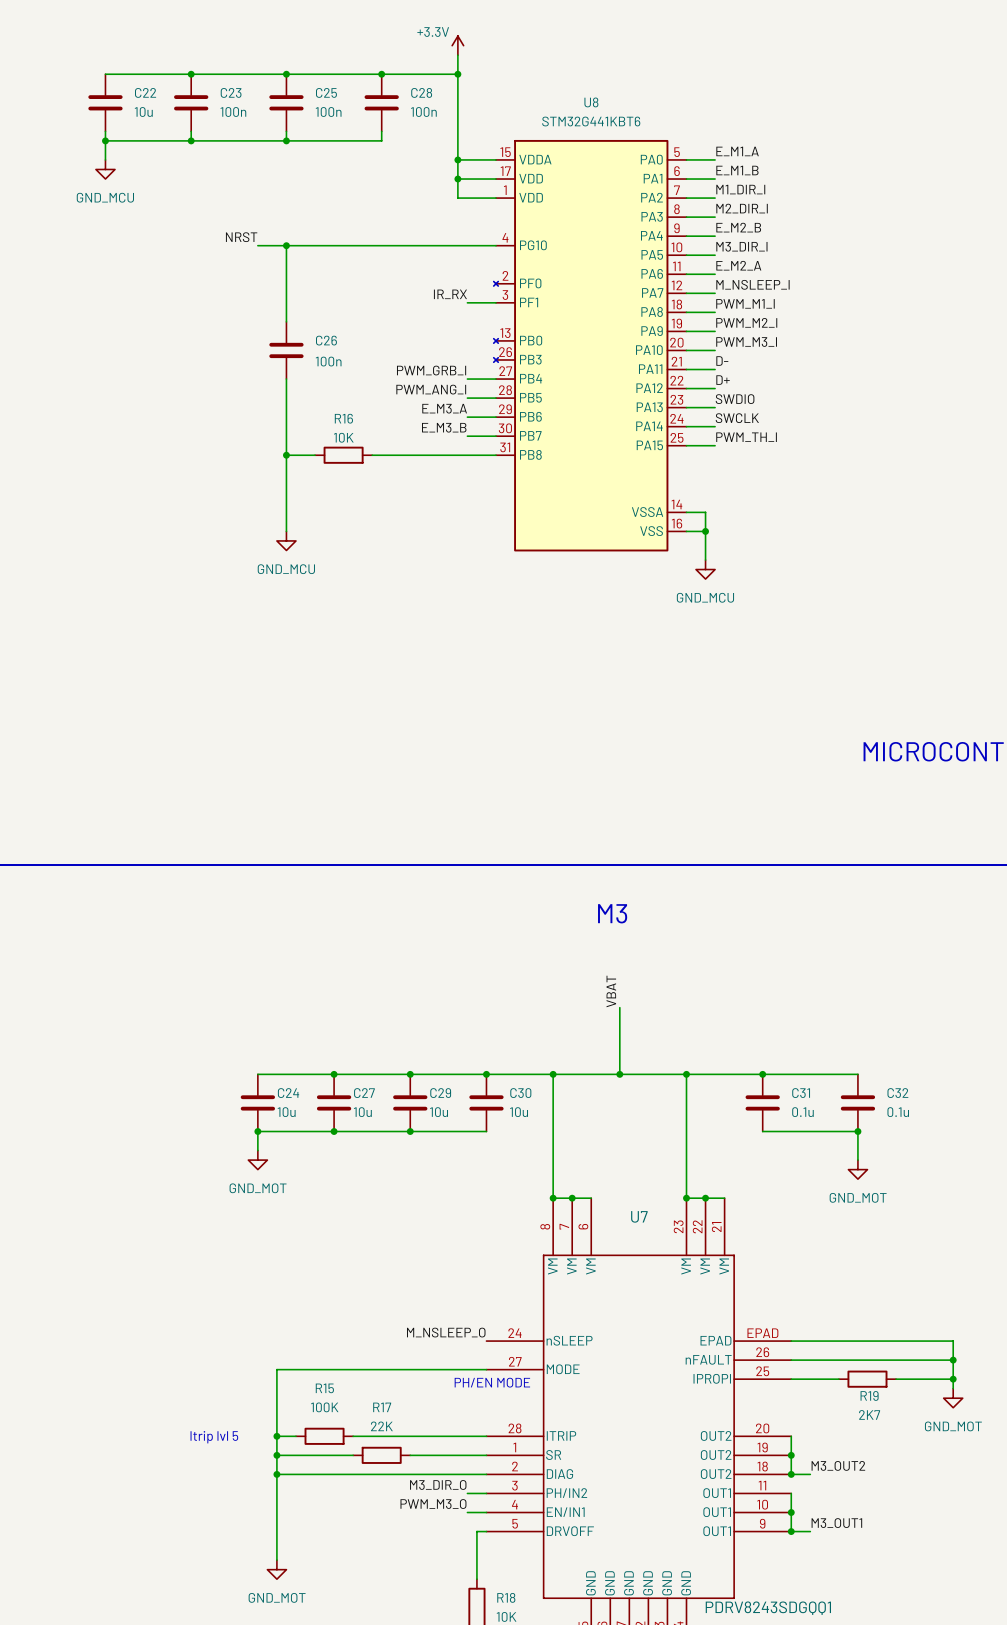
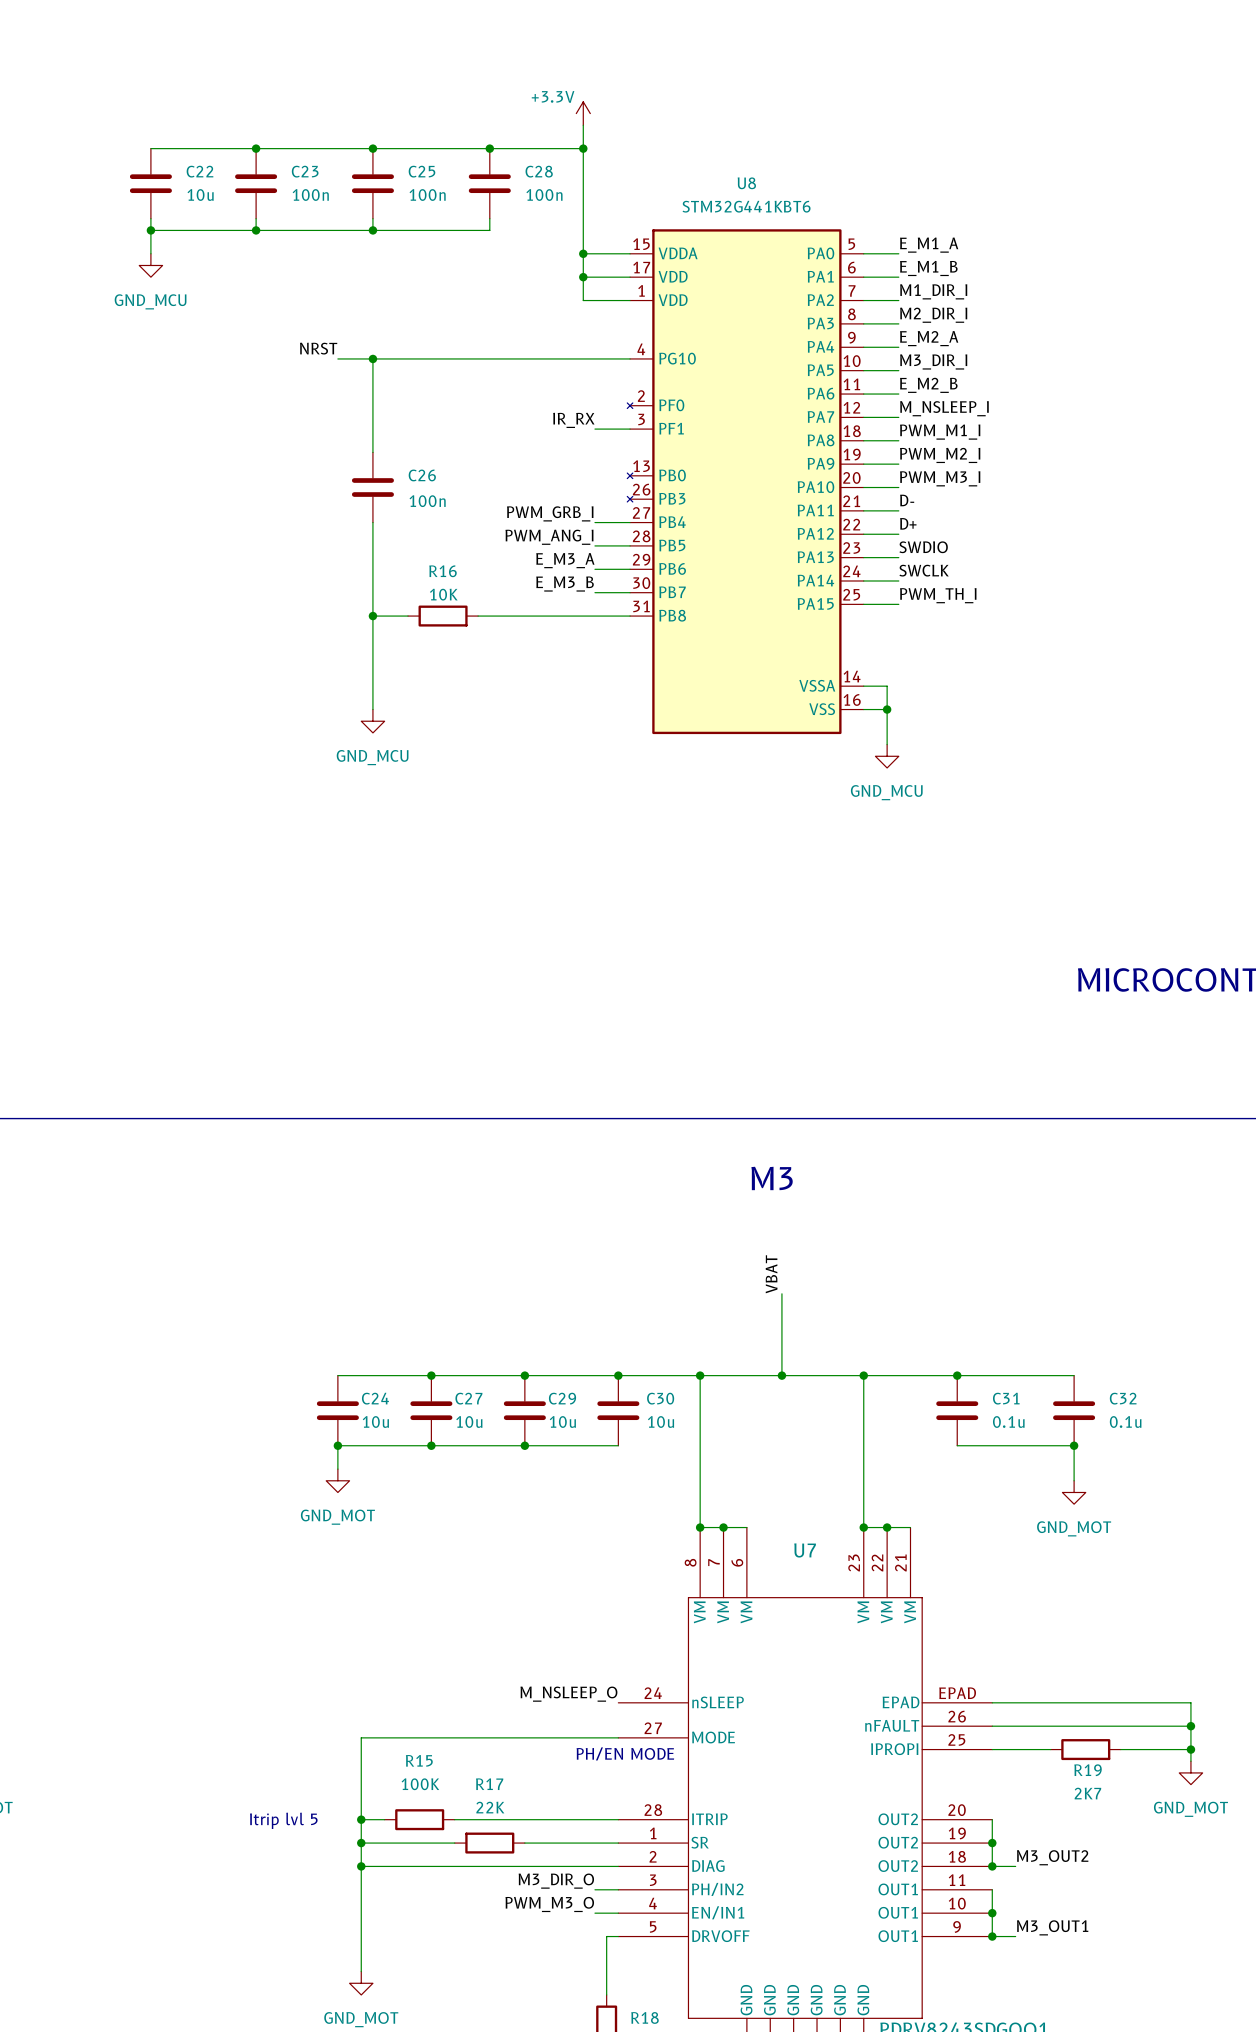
label: E_M2_B (738, 227) -> E_M2_A (929, 338)
label: E_M2_A (738, 265) -> E_M2_B (928, 385)

